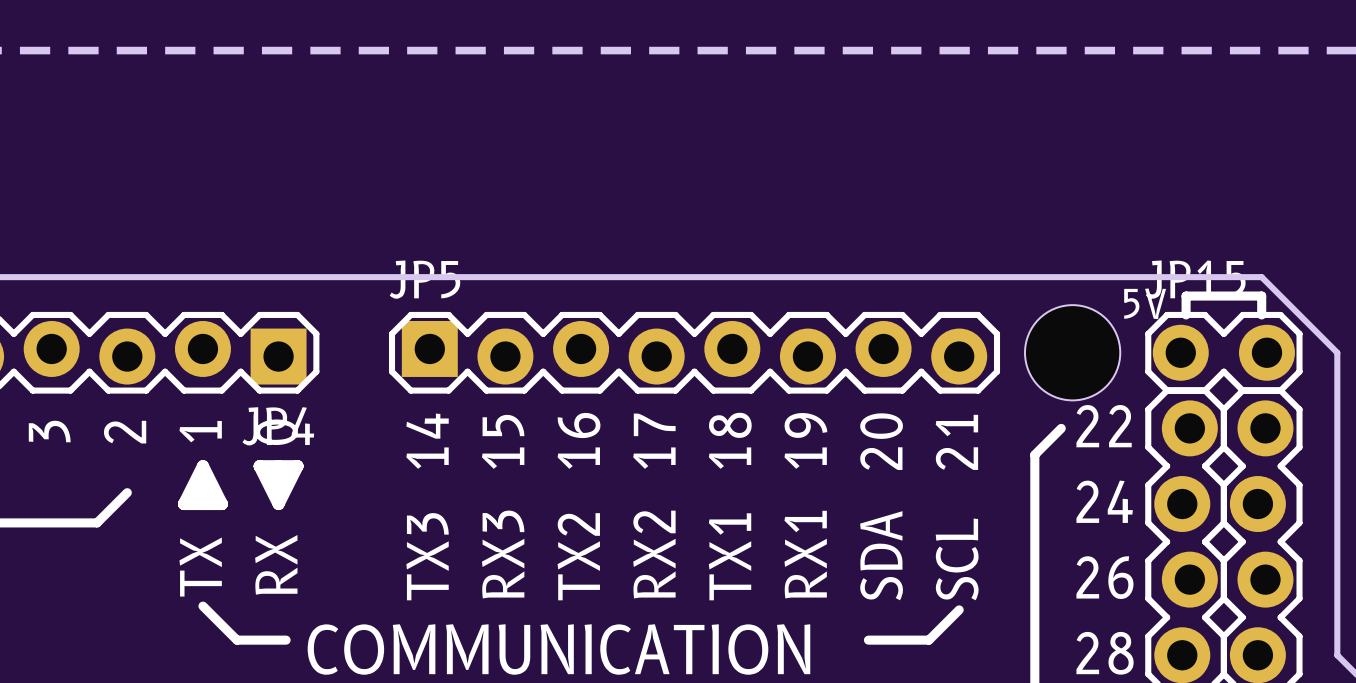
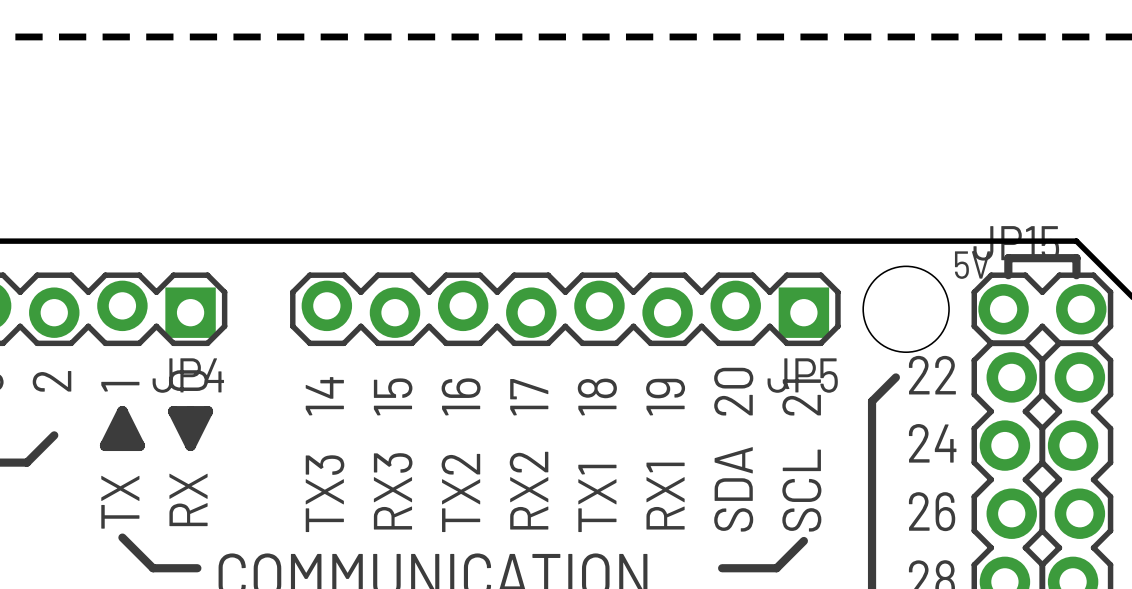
JP5 rotation: 0° (694, 352) -> 180° (565, 309)

